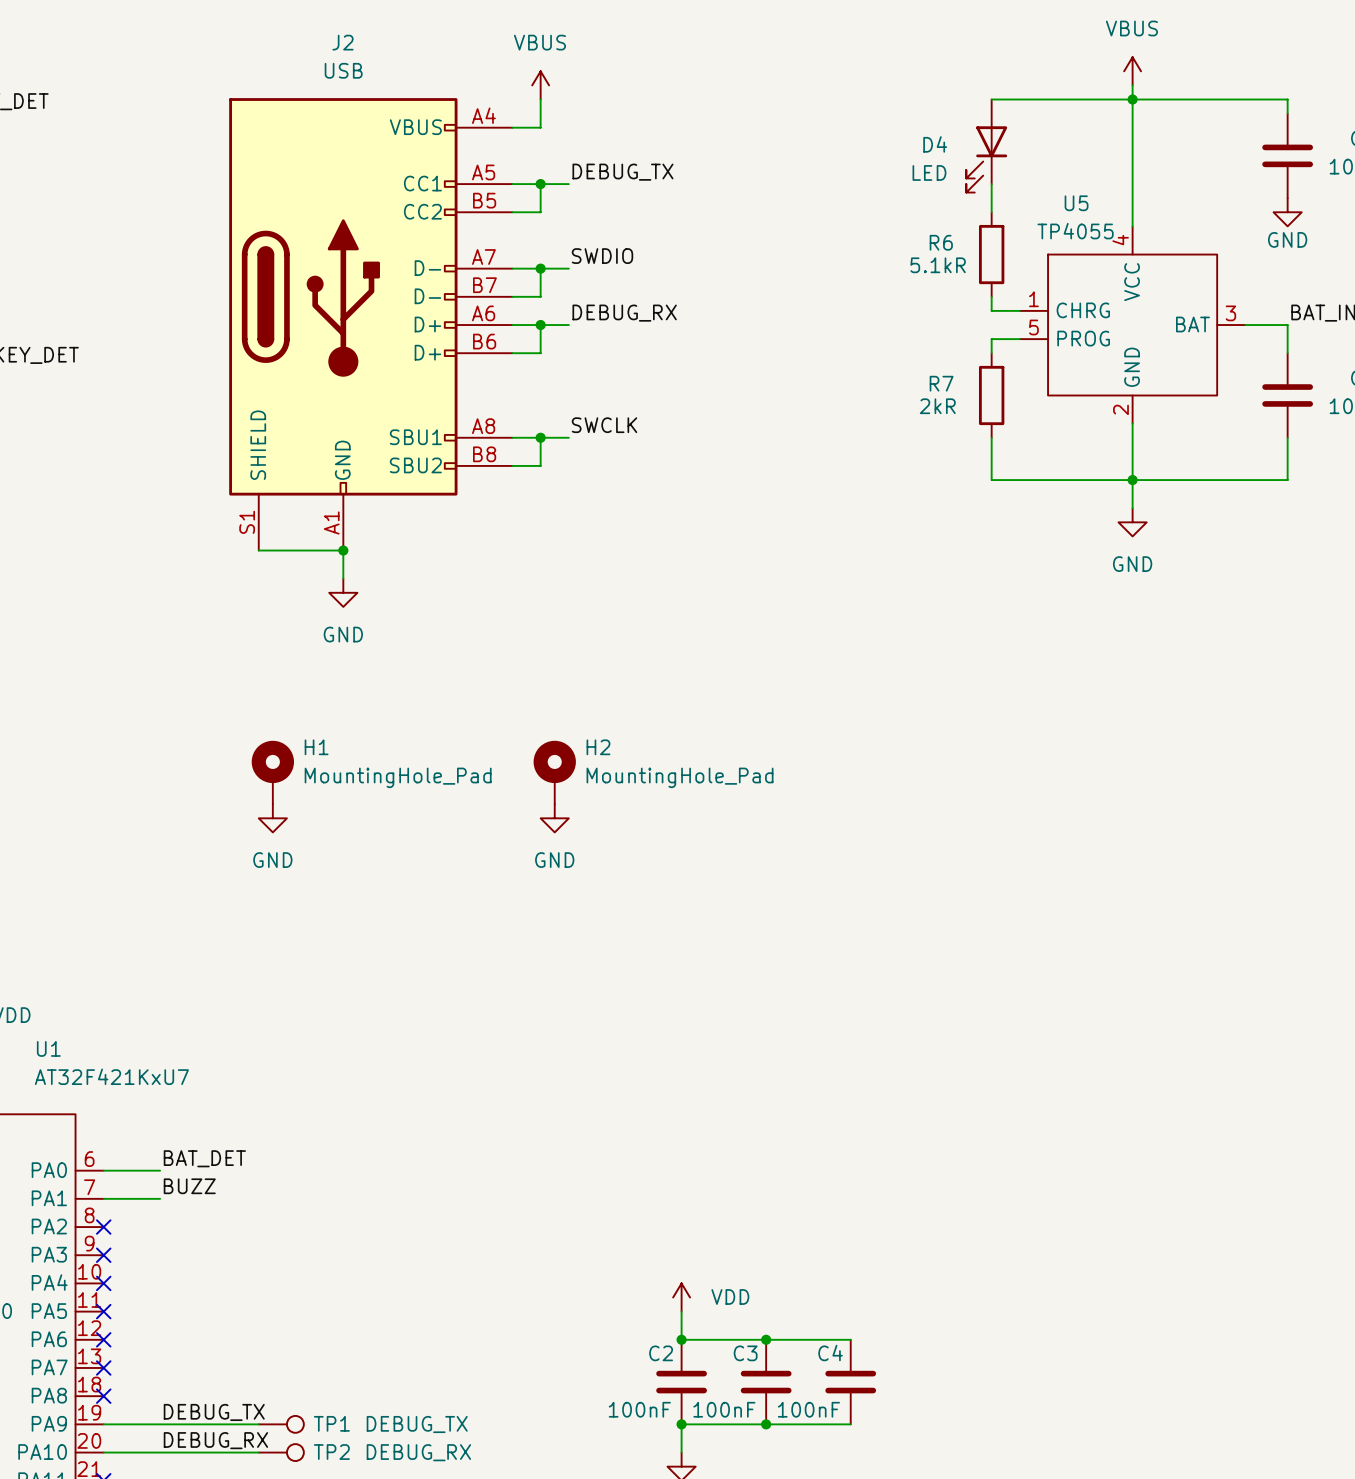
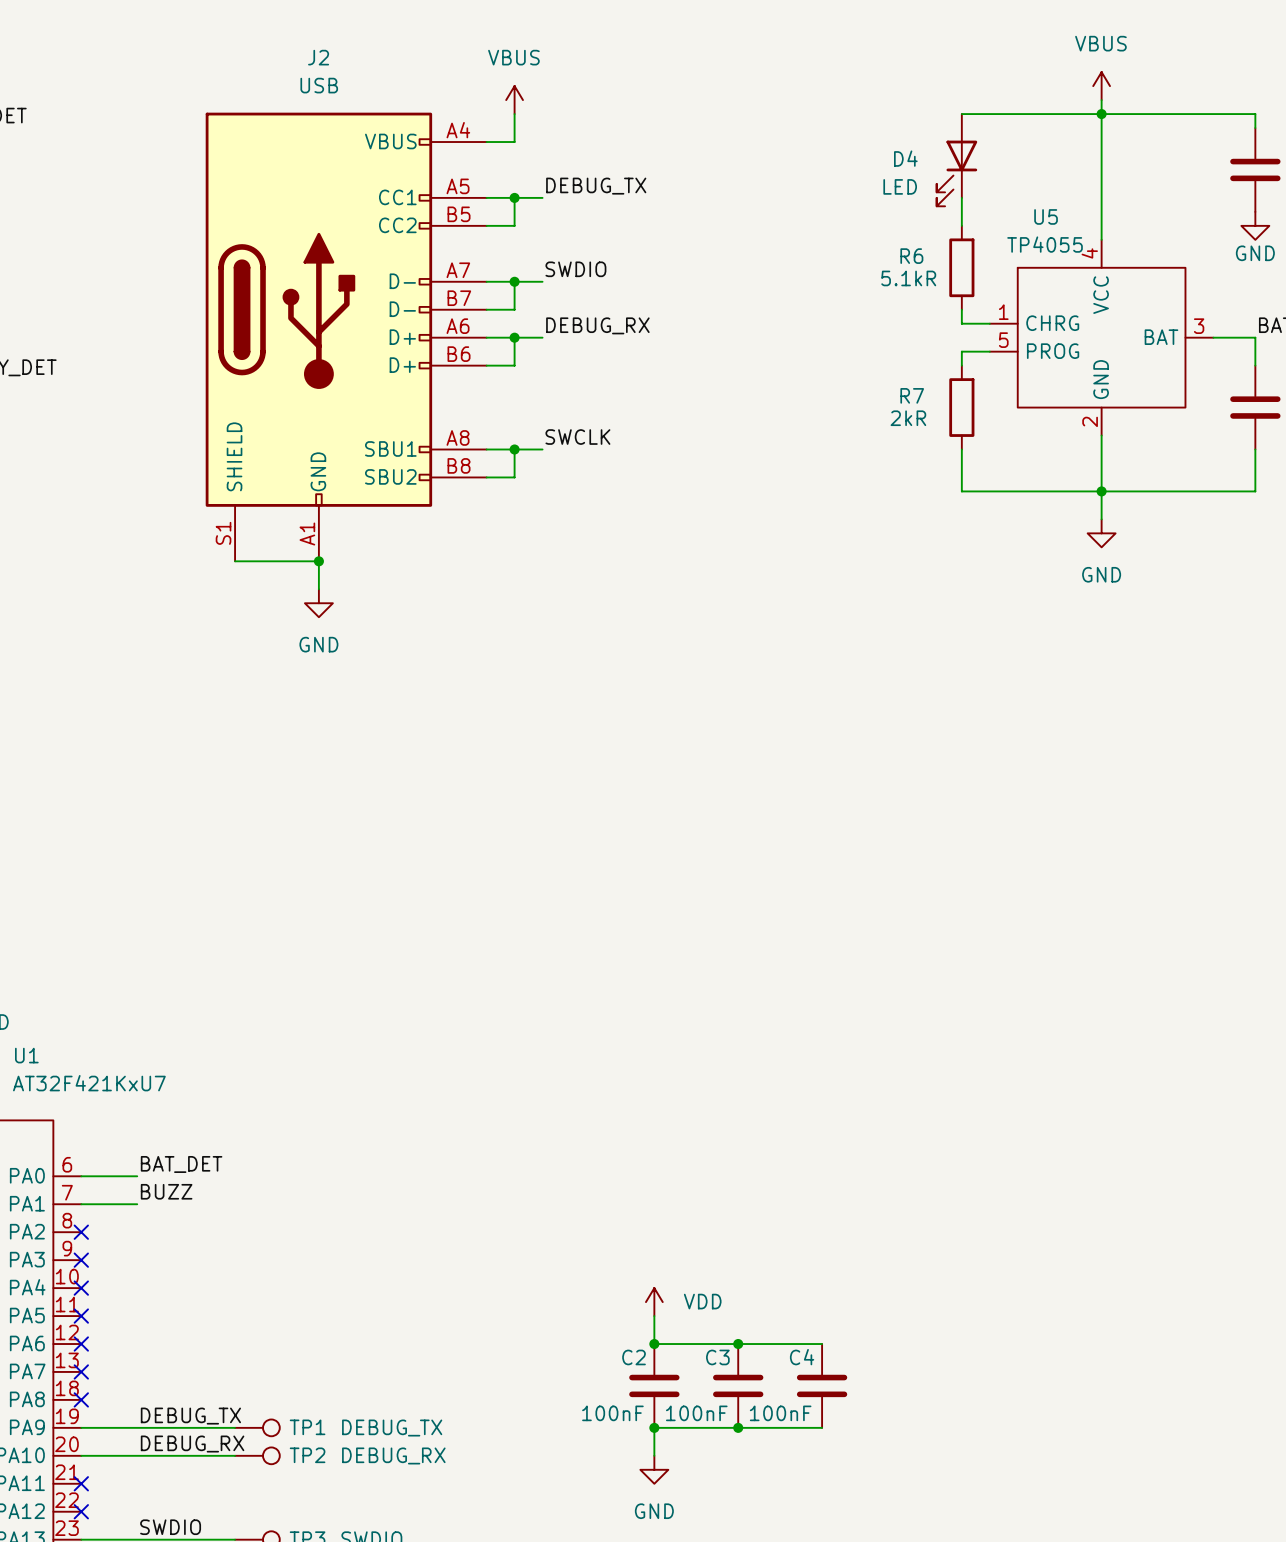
H1: MountingHole_Pad (272, 772) -> none
H2: MountingHole_Pad (554, 772) -> none
power symbol: GND (272, 818) -> none
power symbol: GND (554, 818) -> none

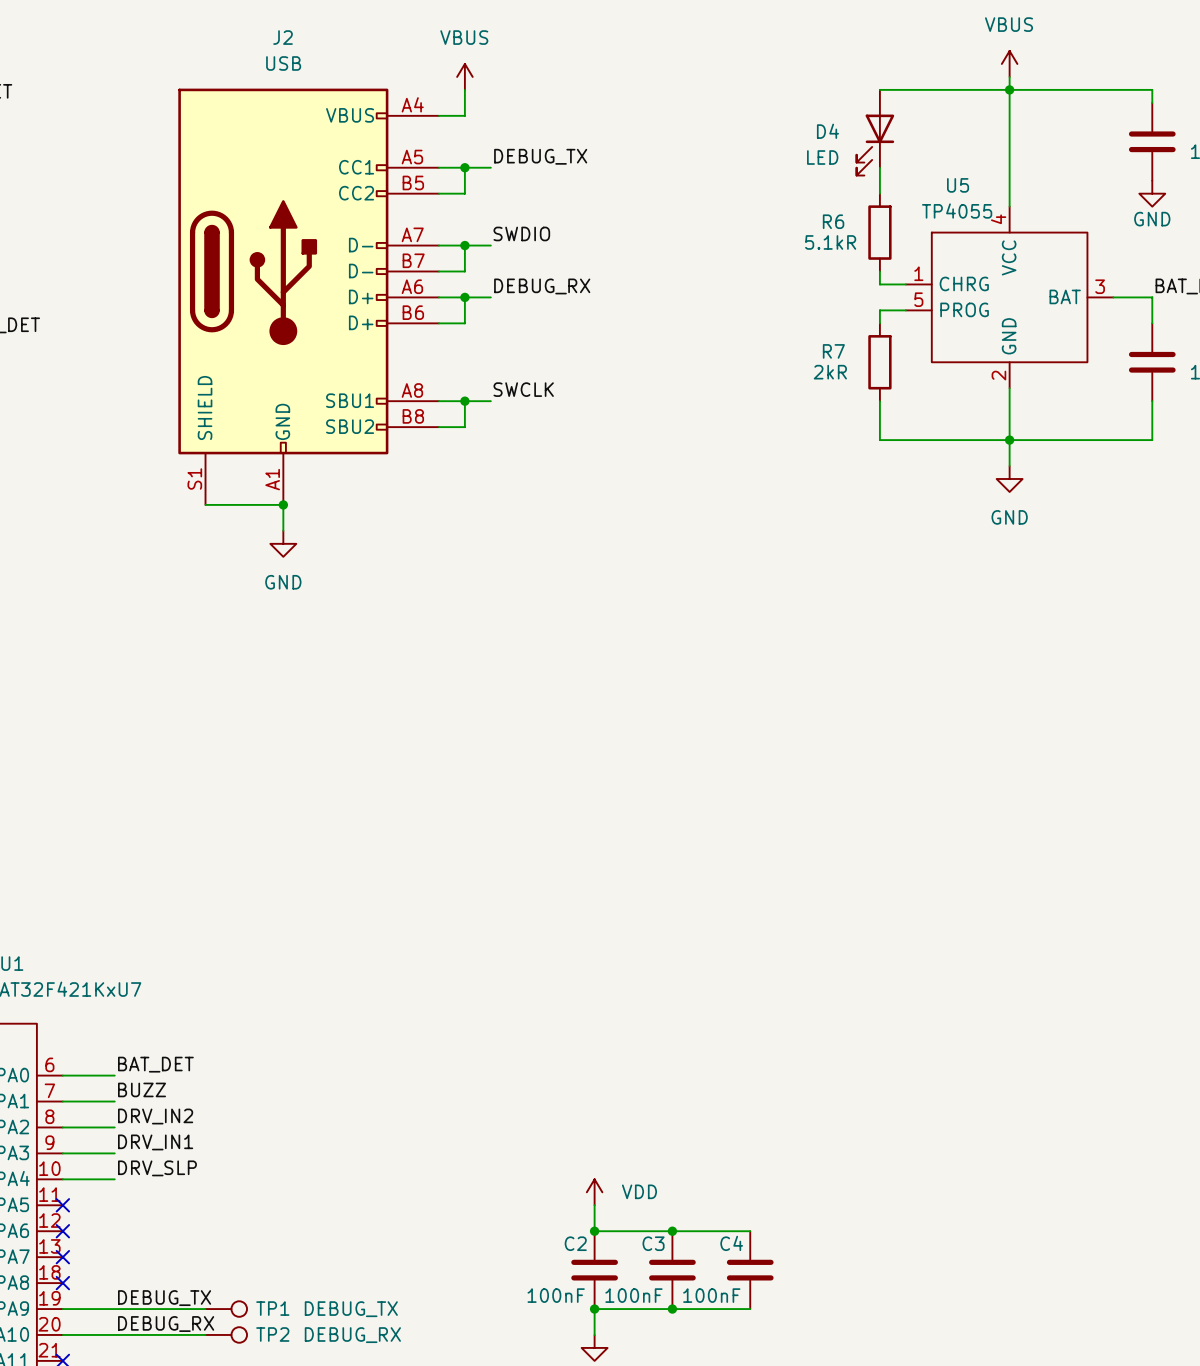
label: none -> DRV_IN2 (155, 1116)
wire: none -> (62, 1127) (114, 1127)
no-connect mark: (81, 1232) -> none
label: none -> DRV_IN1 (155, 1142)
wire: none -> (62, 1153) (114, 1153)
no-connect mark: (81, 1260) -> none
label: none -> DRV_SLP (157, 1168)
wire: none -> (62, 1179) (114, 1179)
no-connect mark: (81, 1288) -> none

